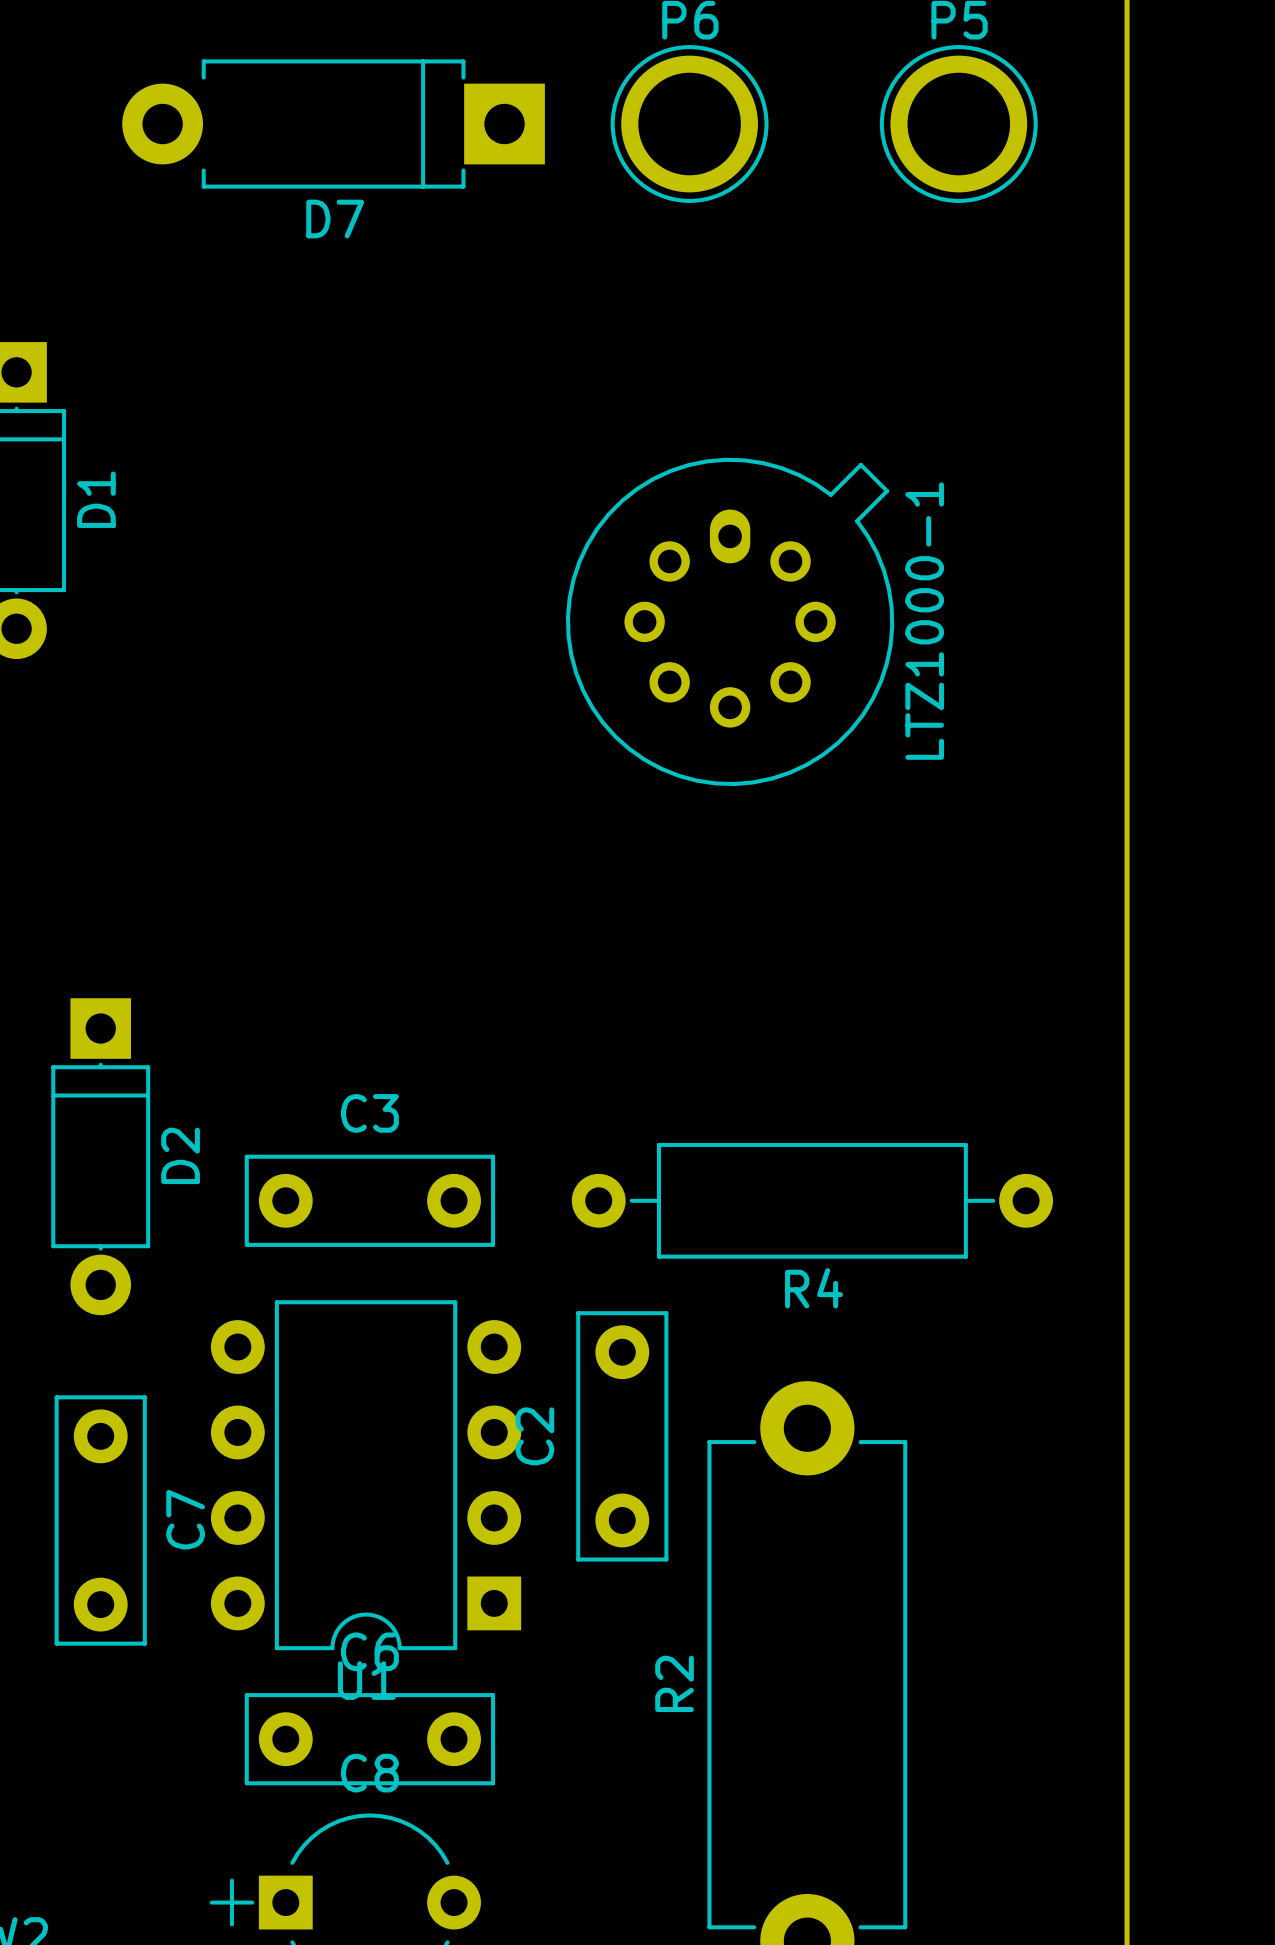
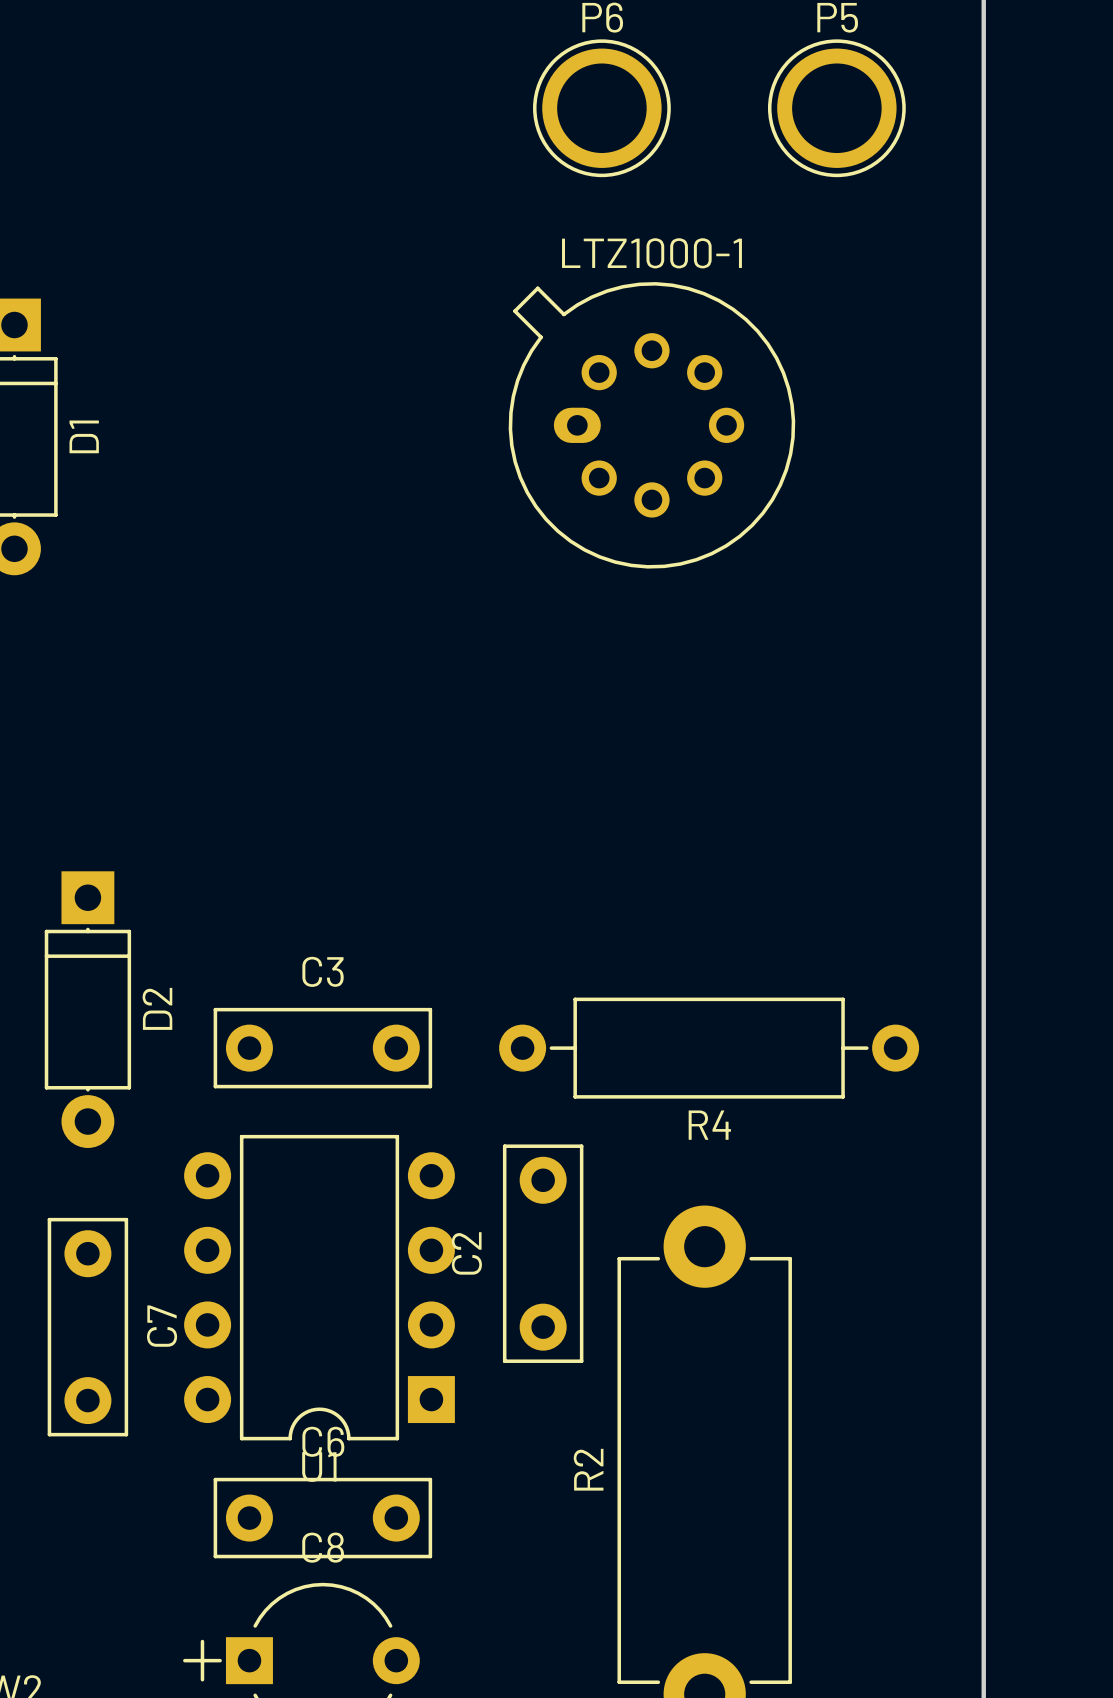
D7: (333, 124) -> none
LTZ1000-1 rotation: 0° (730, 621) -> 90° counterclockwise (651, 425)

